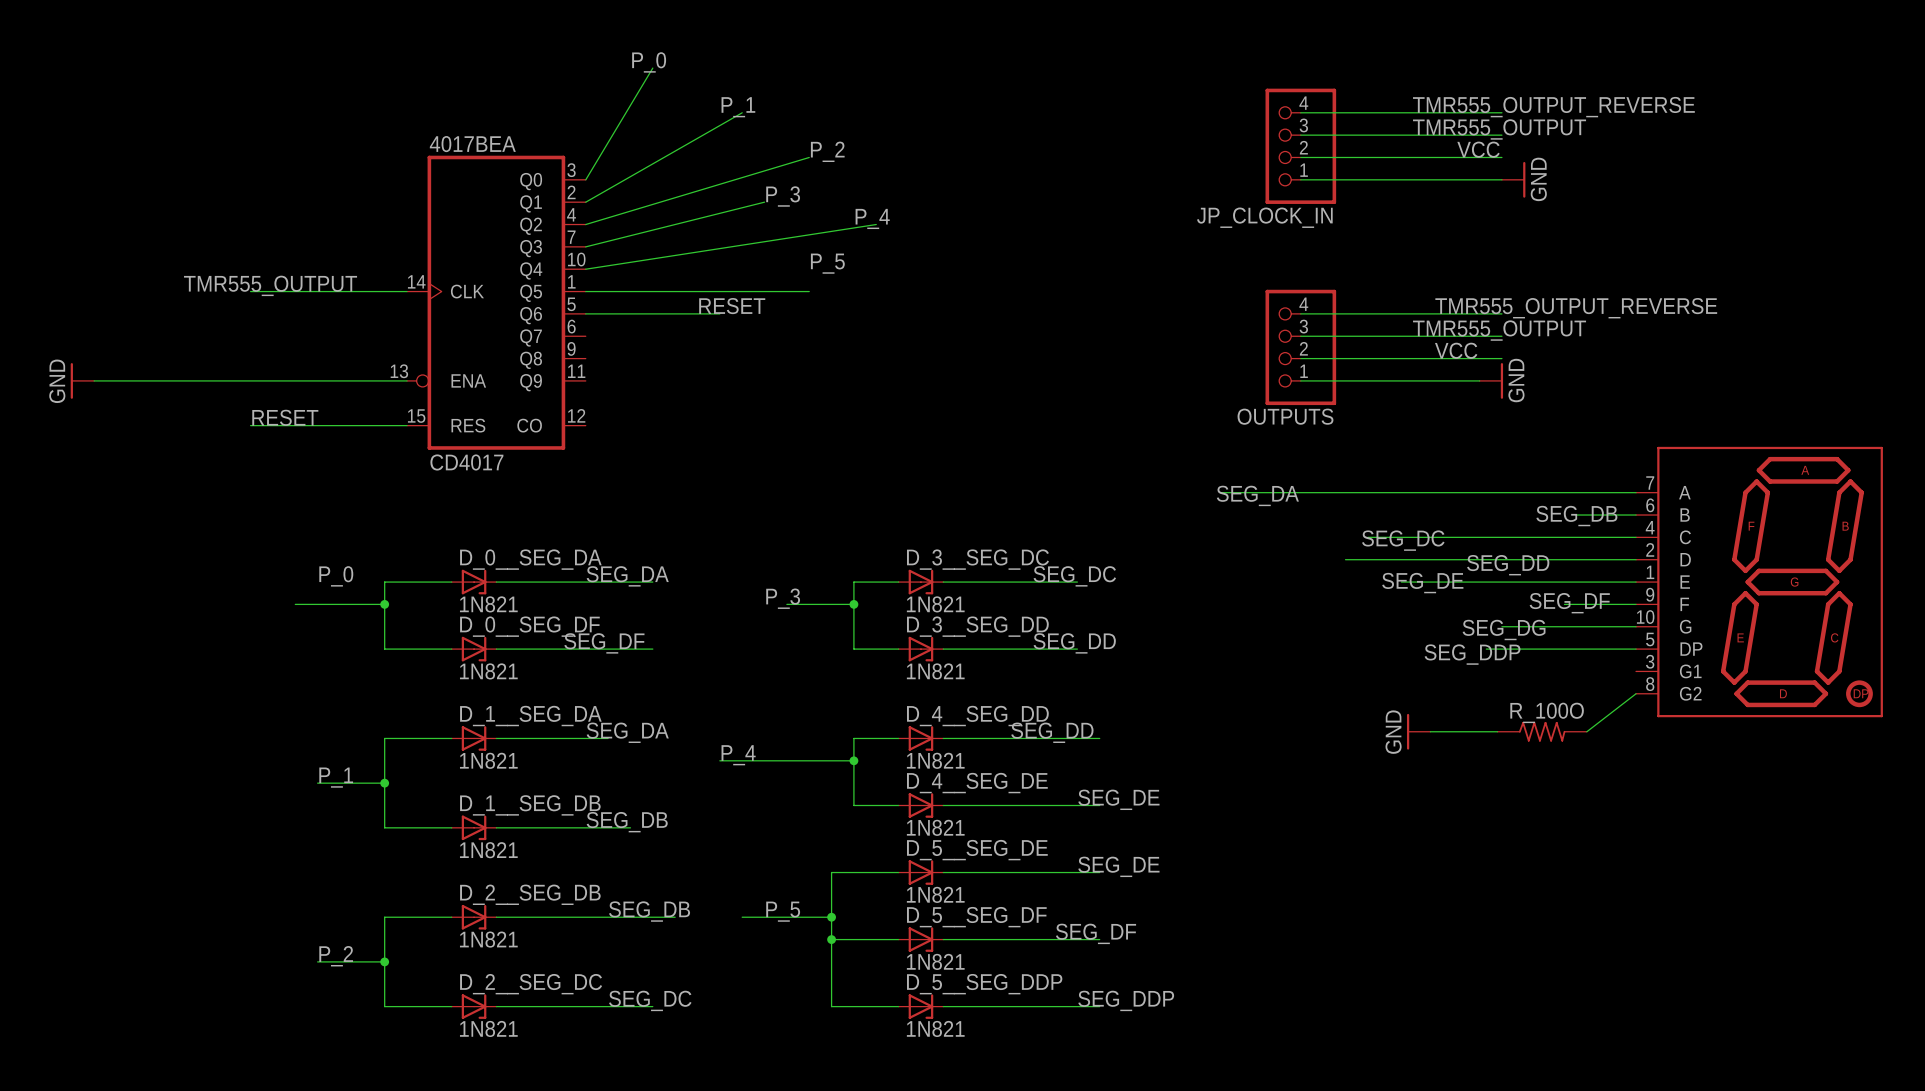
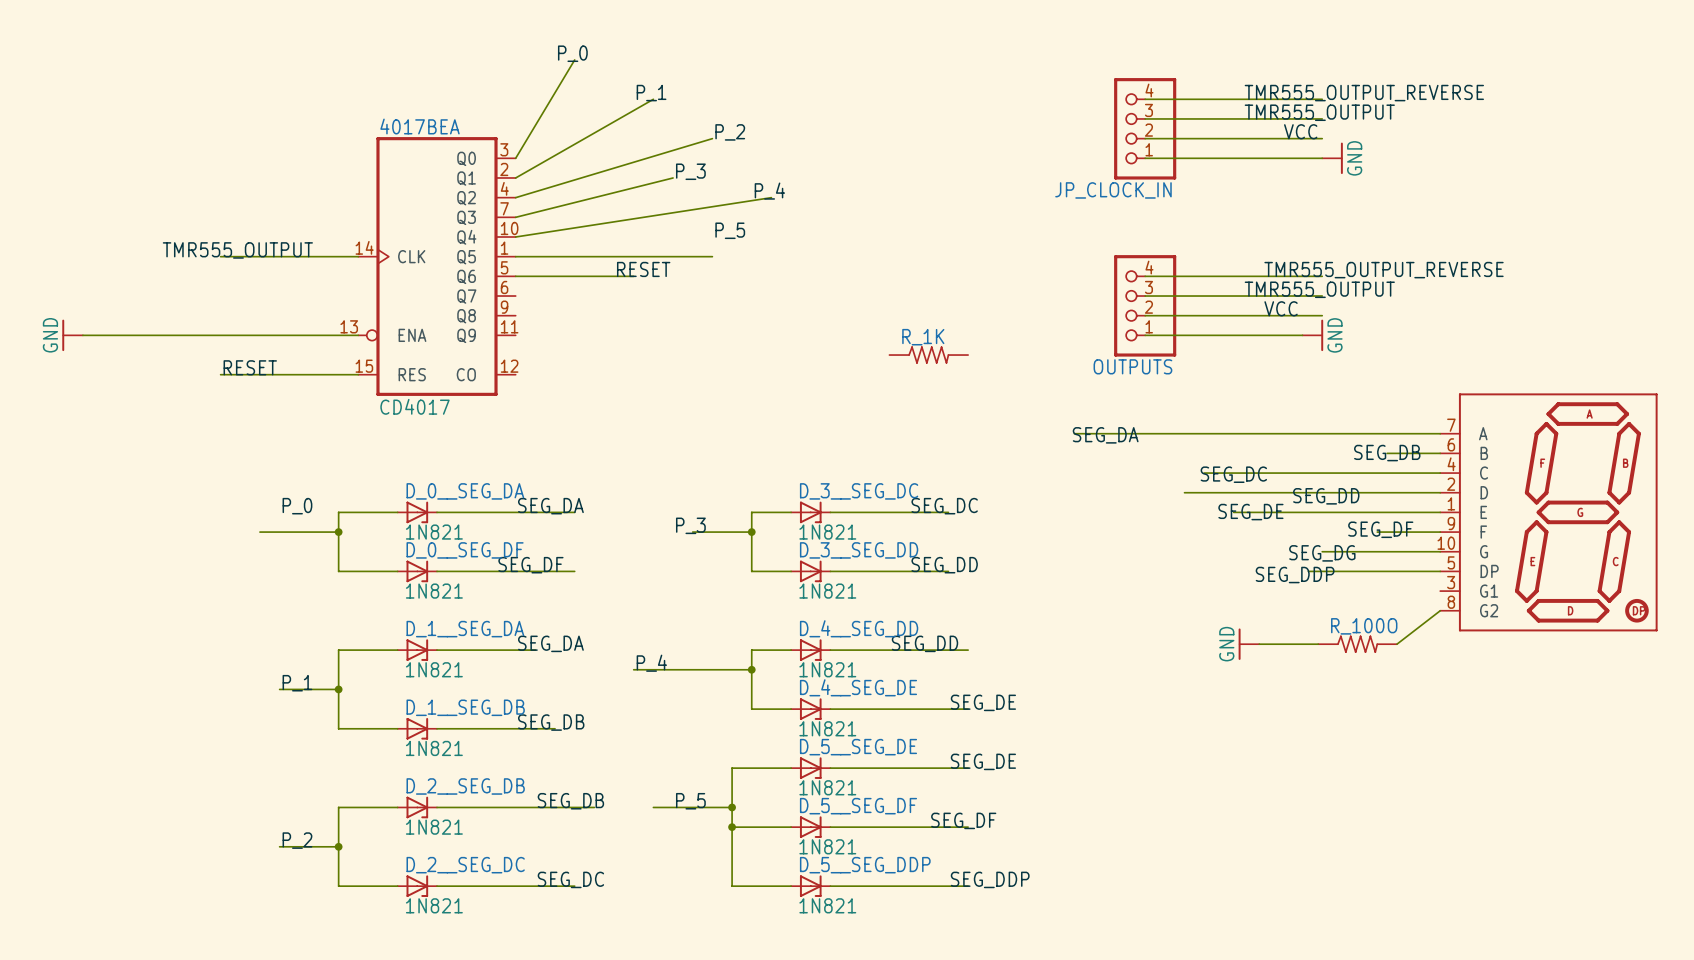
R_1K: none -> (928, 355)

